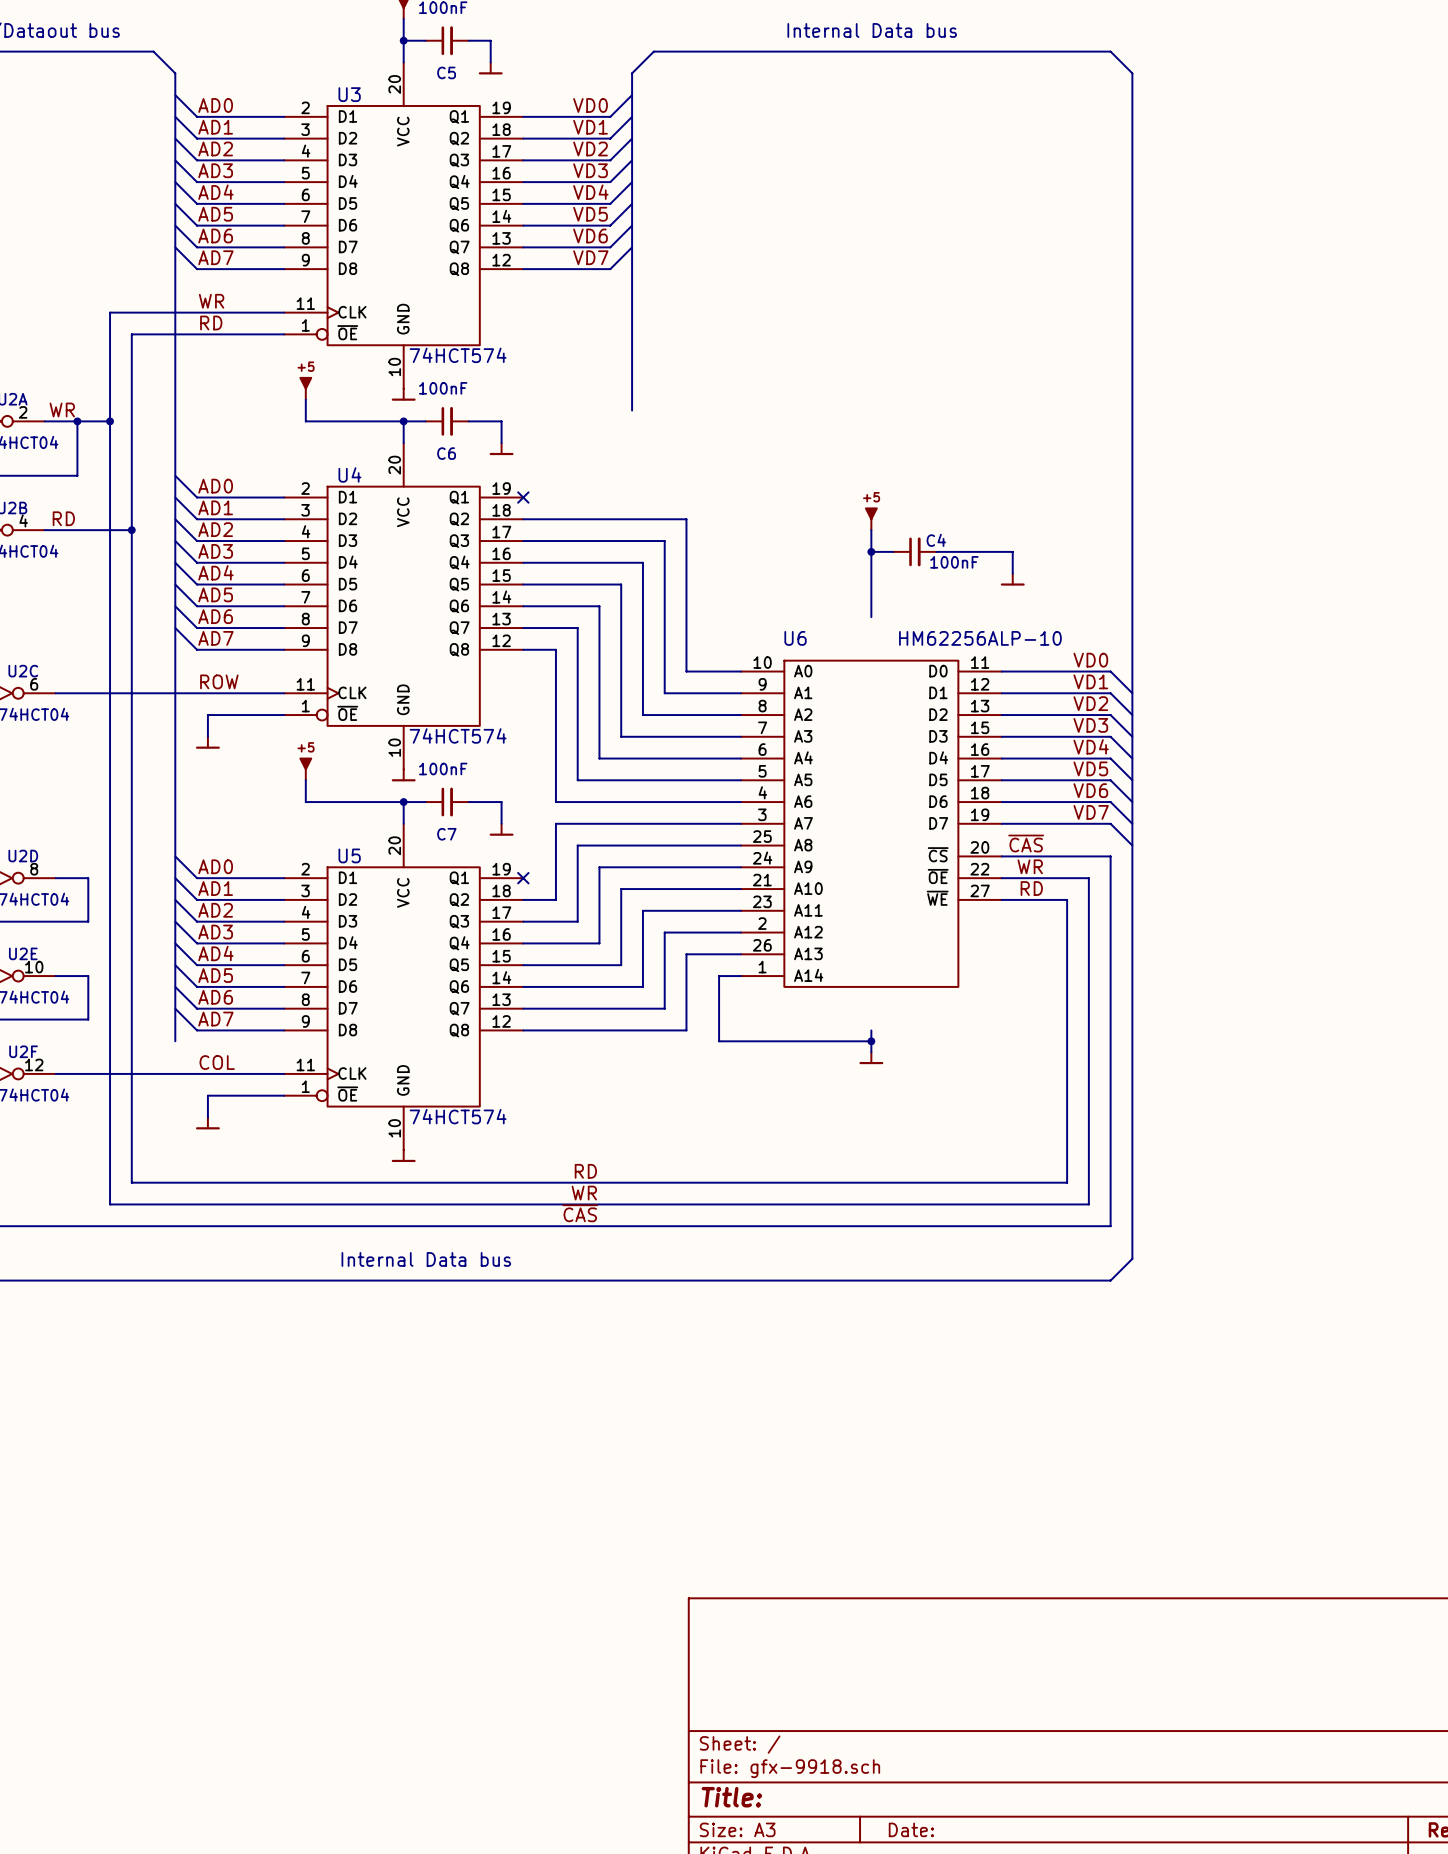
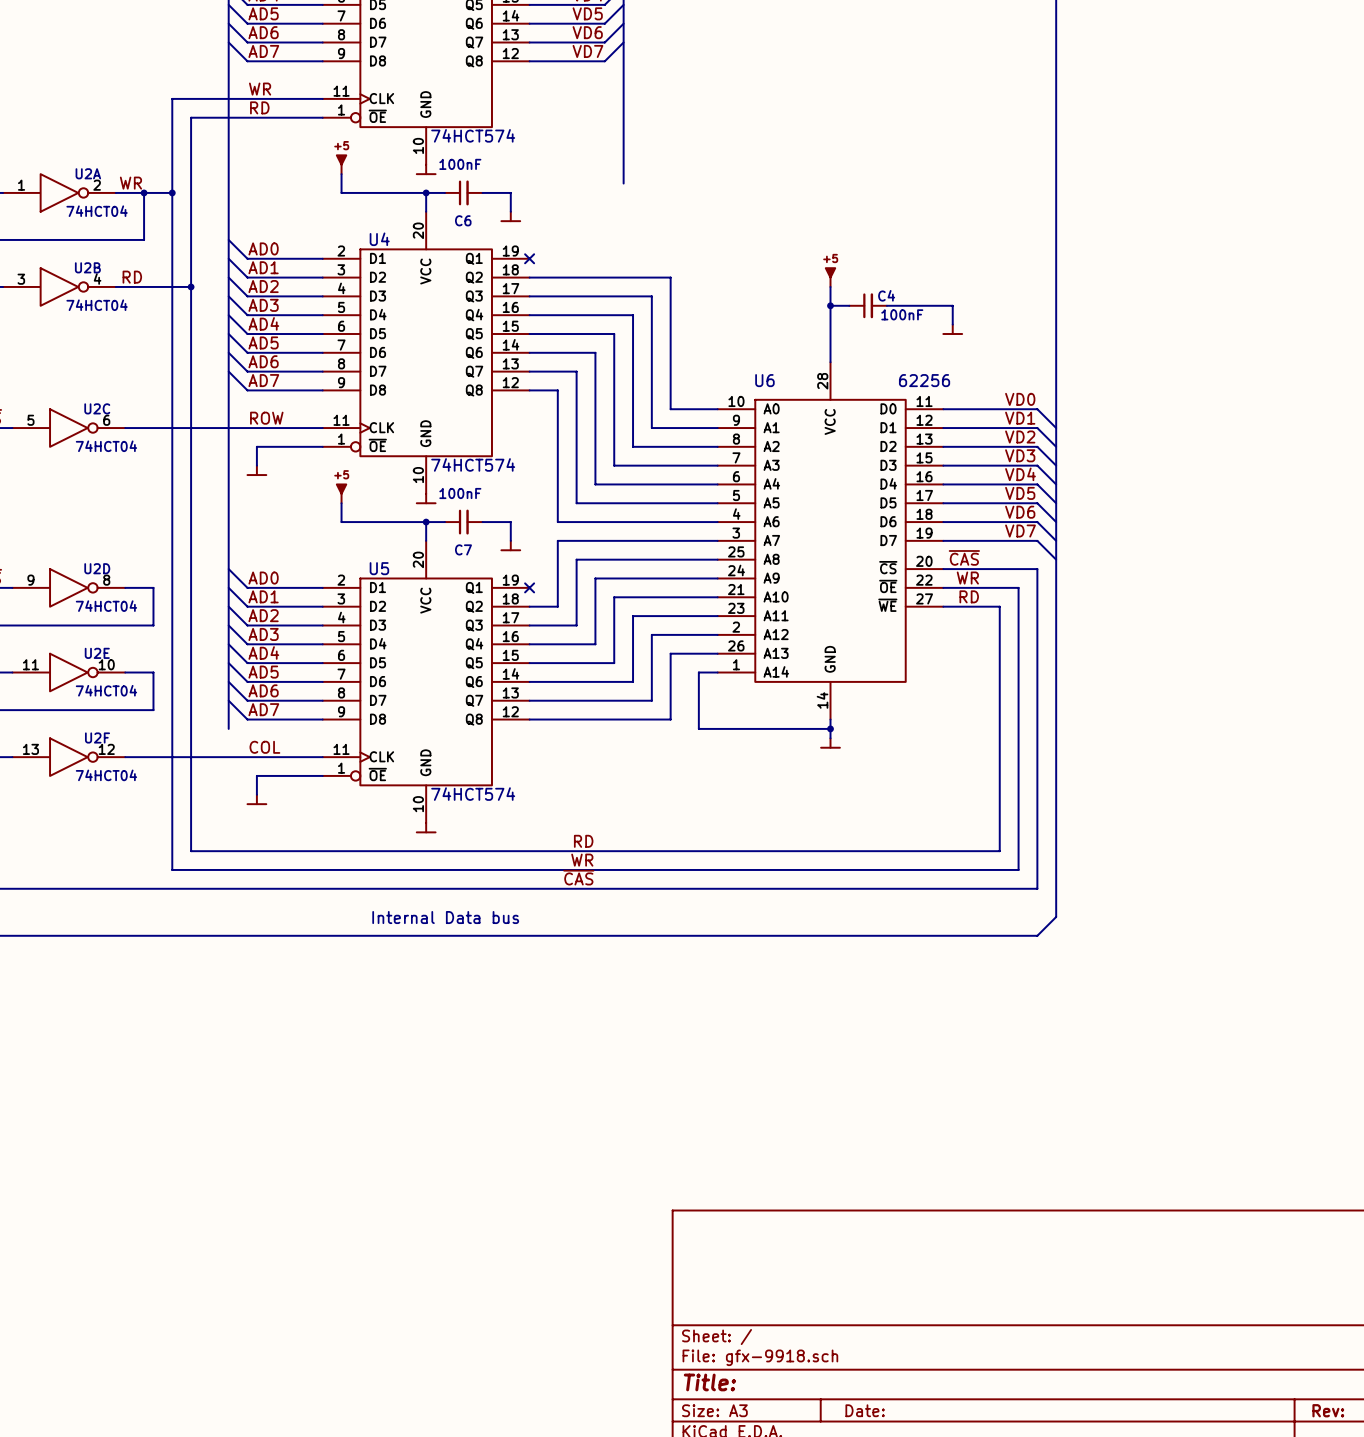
U6 value: HM62256ALP-10 (980, 638) -> 62256 (924, 380)
U6 symbol: [740, 660, 1002, 987] -> [717, 362, 944, 720]

